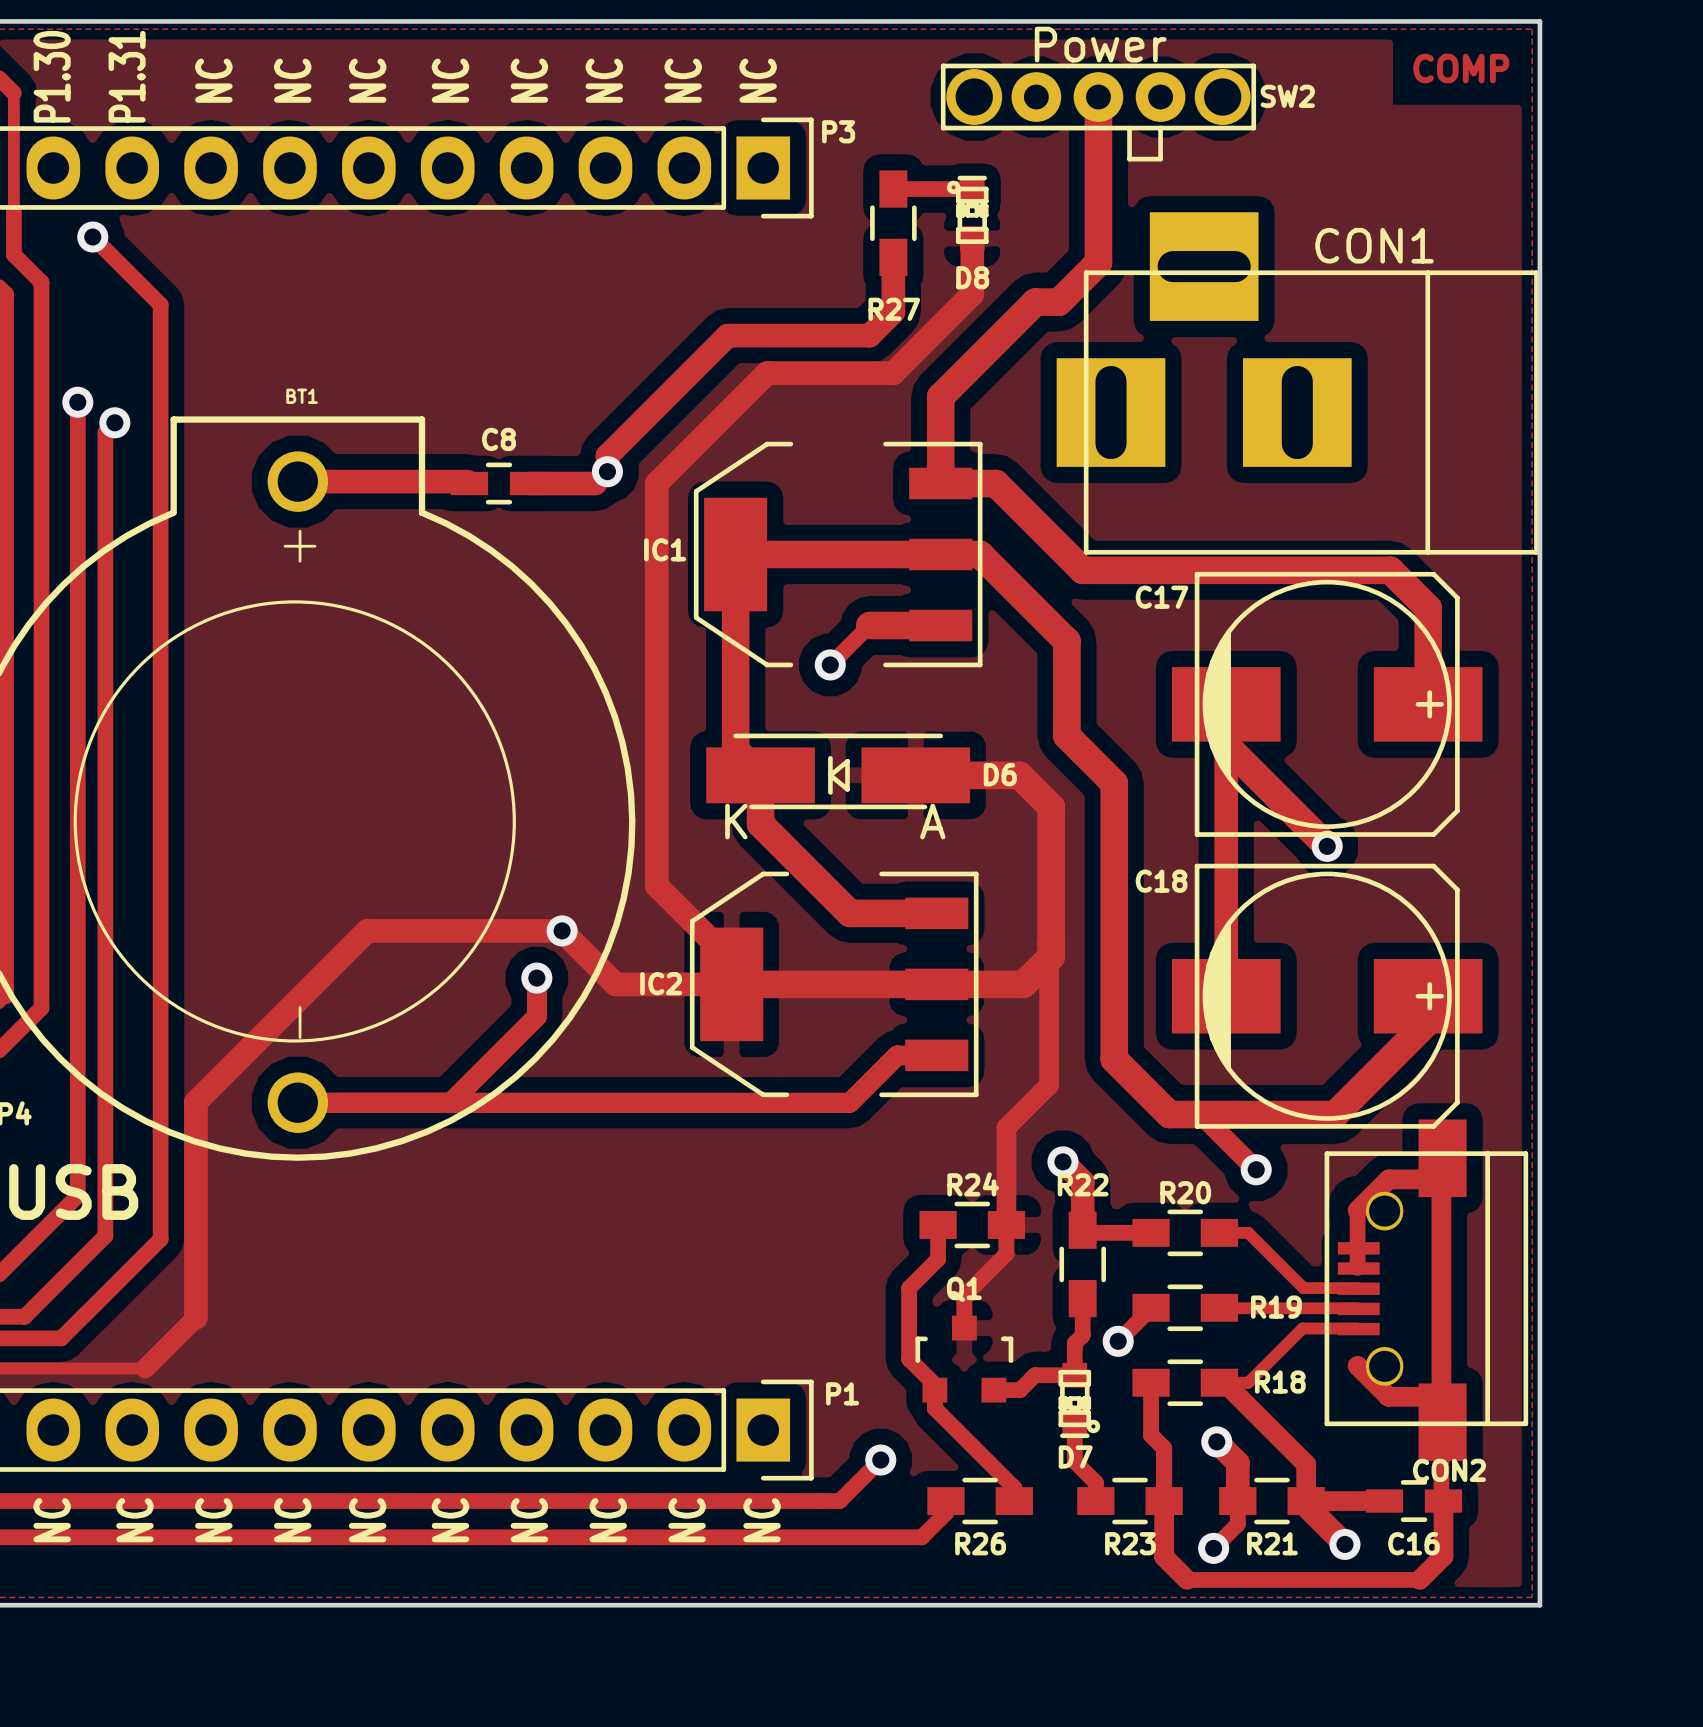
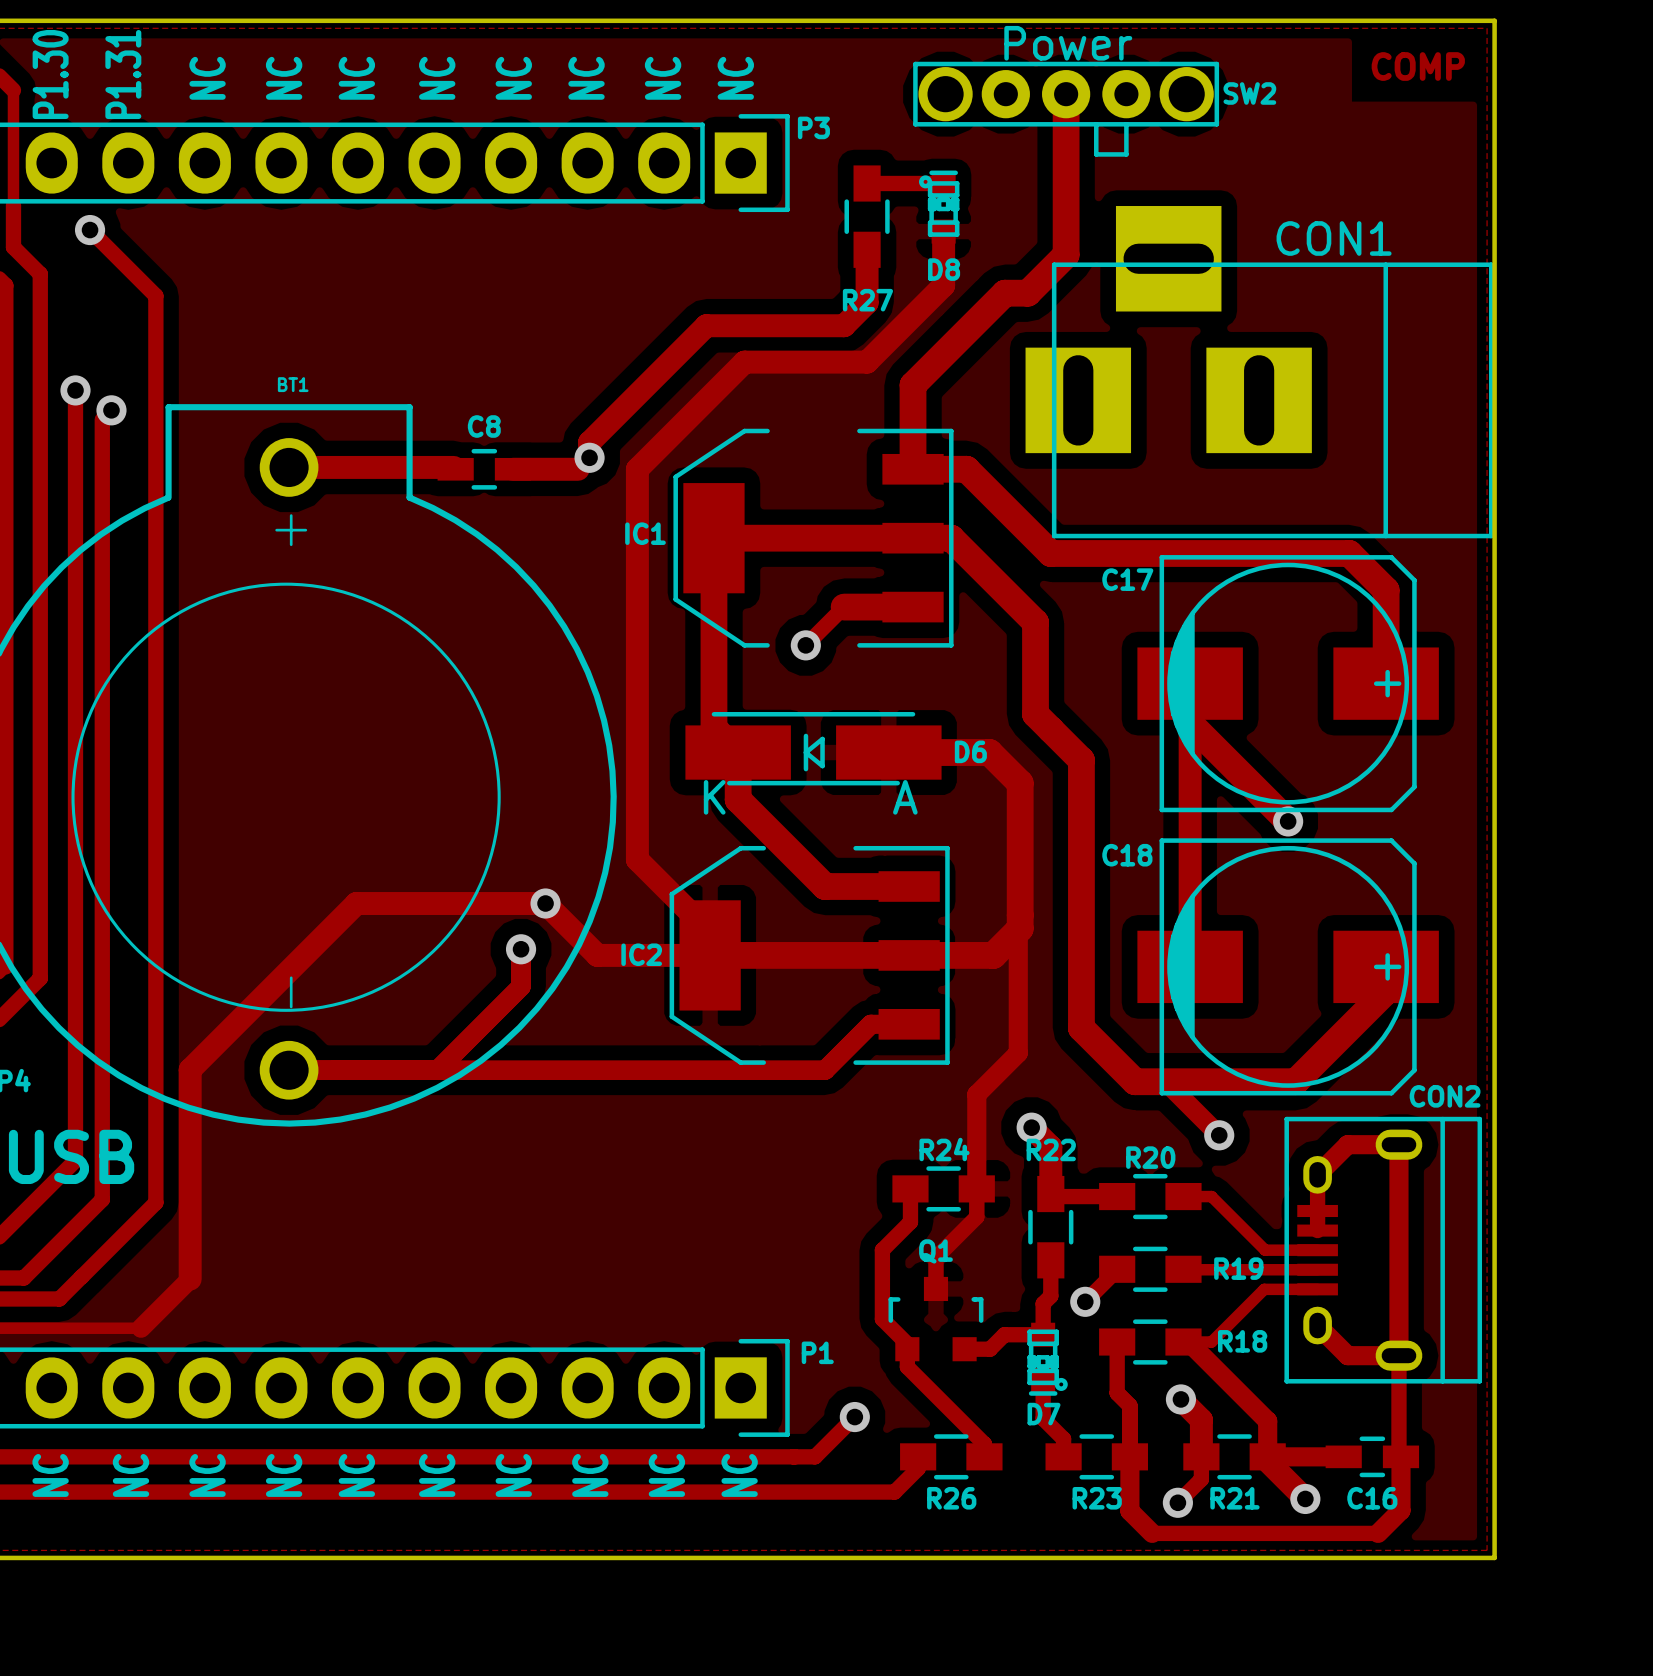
CON2 footprint: [1324, 1119, 1529, 1462] -> [1284, 1116, 1483, 1384]
CON2 name position: CON2 (1449, 1470) -> CON2 (1445, 1096)

